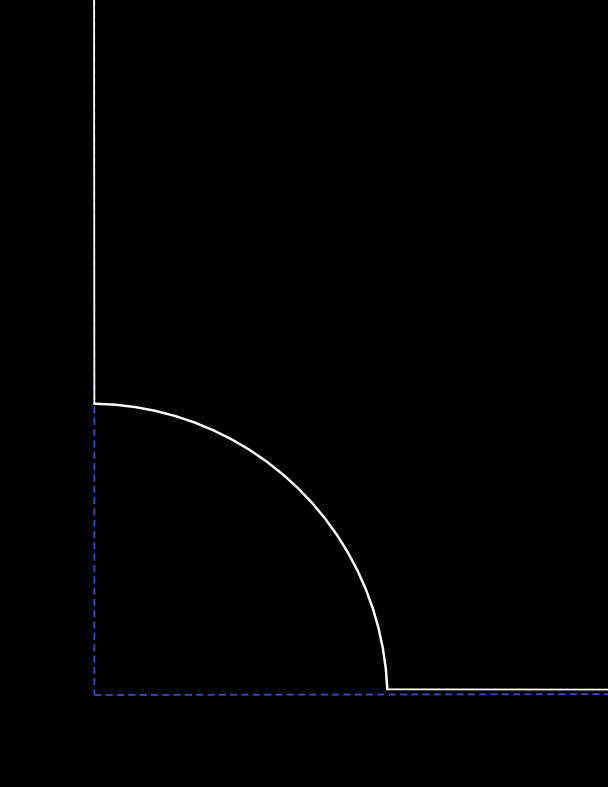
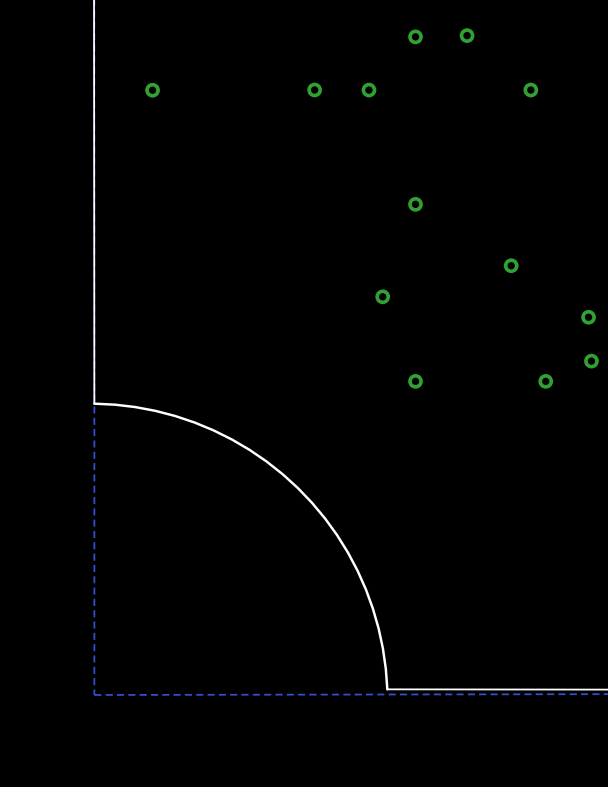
via: none -> (467, 35)
via: none -> (415, 36)
via: none -> (314, 89)
via: none -> (152, 90)
via: none -> (368, 90)
via: none -> (530, 90)
via: none -> (415, 204)
via: none -> (511, 265)
via: none -> (382, 296)
via: none -> (588, 317)
via: none -> (591, 361)
via: none -> (415, 381)
via: none -> (545, 381)

